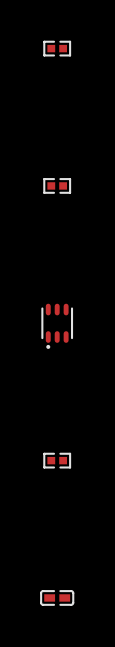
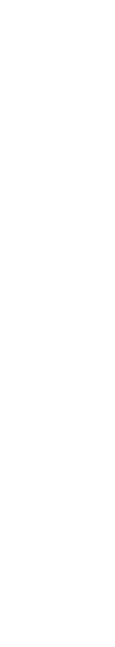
part: (57, 48) -> none
part: (57, 185) -> none
part: (57, 326) -> none
part: (57, 460) -> none
part: (57, 597) -> none

